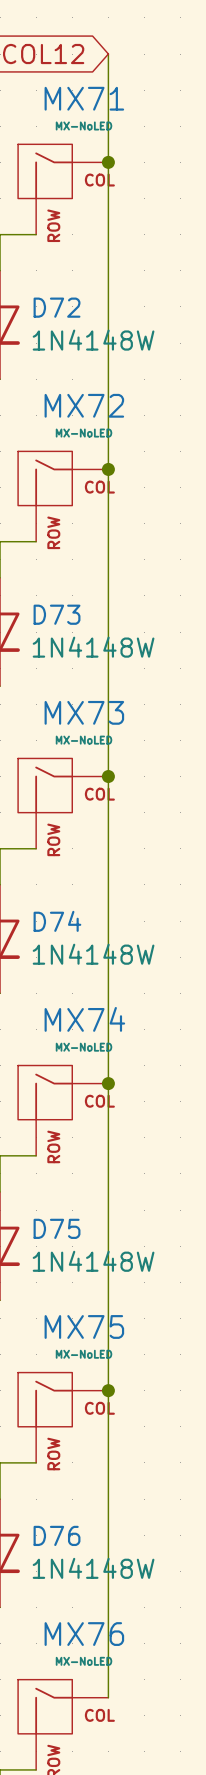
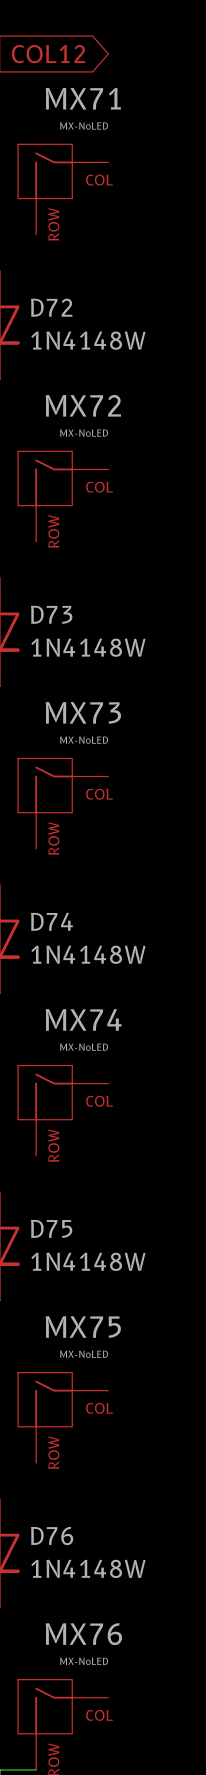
wire: (108, 54) (108, 1697) -> none
junction: (108, 162) -> none
wire: (36, 234) (0, 234) (0, 270) -> none
junction: (108, 469) -> none
wire: (36, 541) (0, 541) (0, 577) -> none
junction: (108, 776) -> none
wire: (36, 848) (0, 848) (0, 884) -> none
junction: (108, 1083) -> none
wire: (36, 1155) (0, 1155) (0, 1191) -> none
junction: (108, 1390) -> none
wire: (36, 1462) (0, 1462) (0, 1499) -> none

